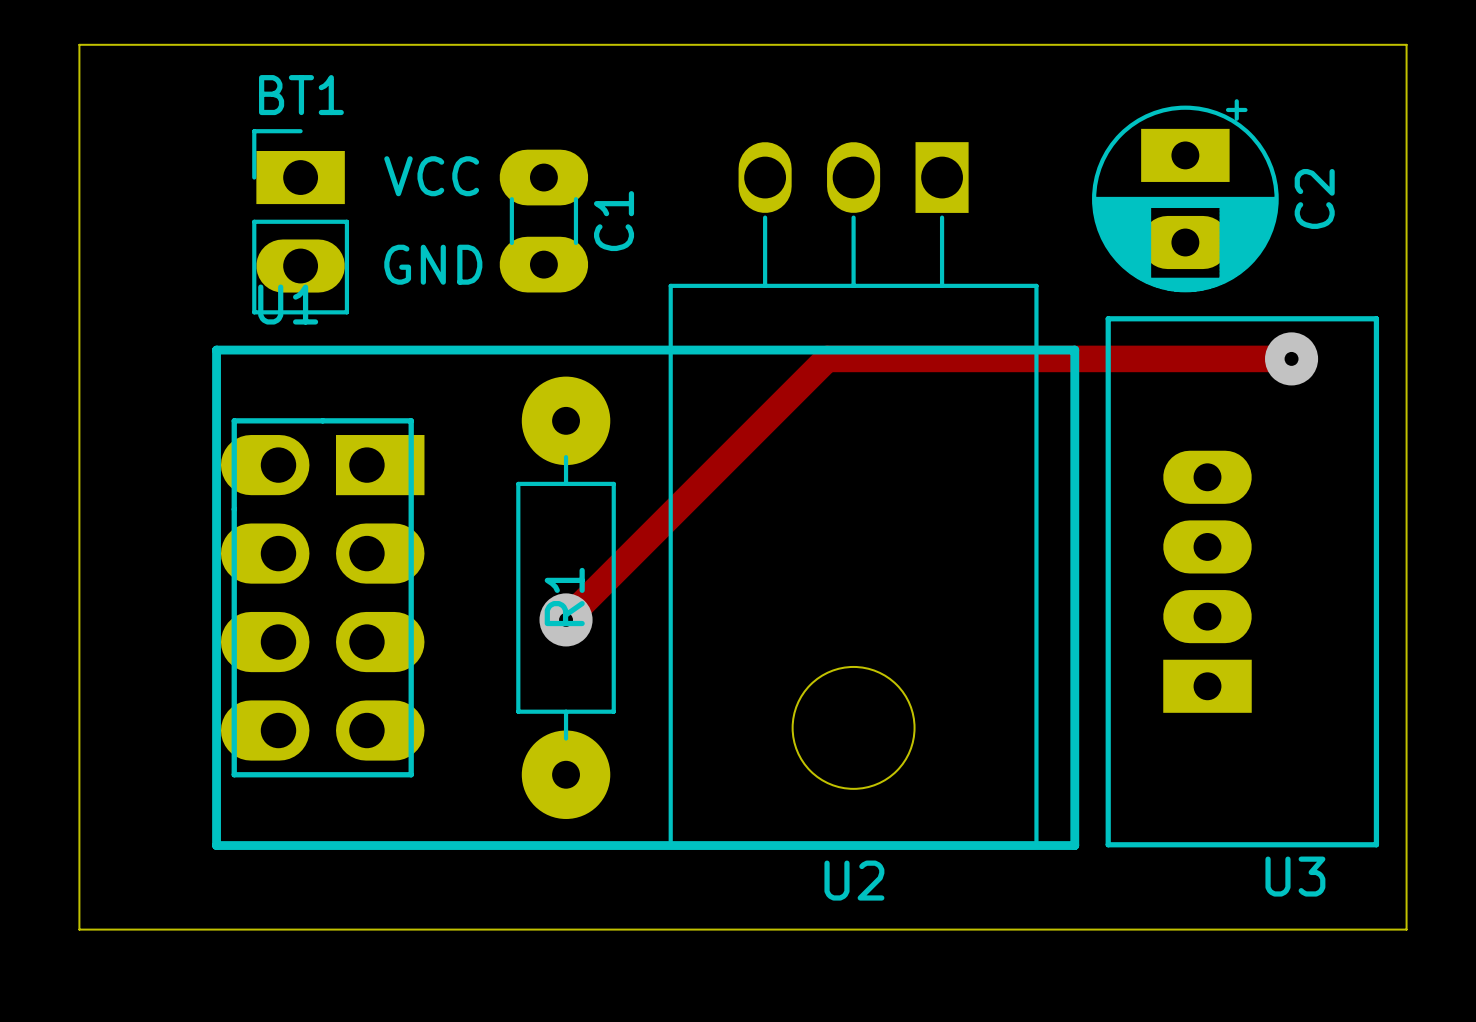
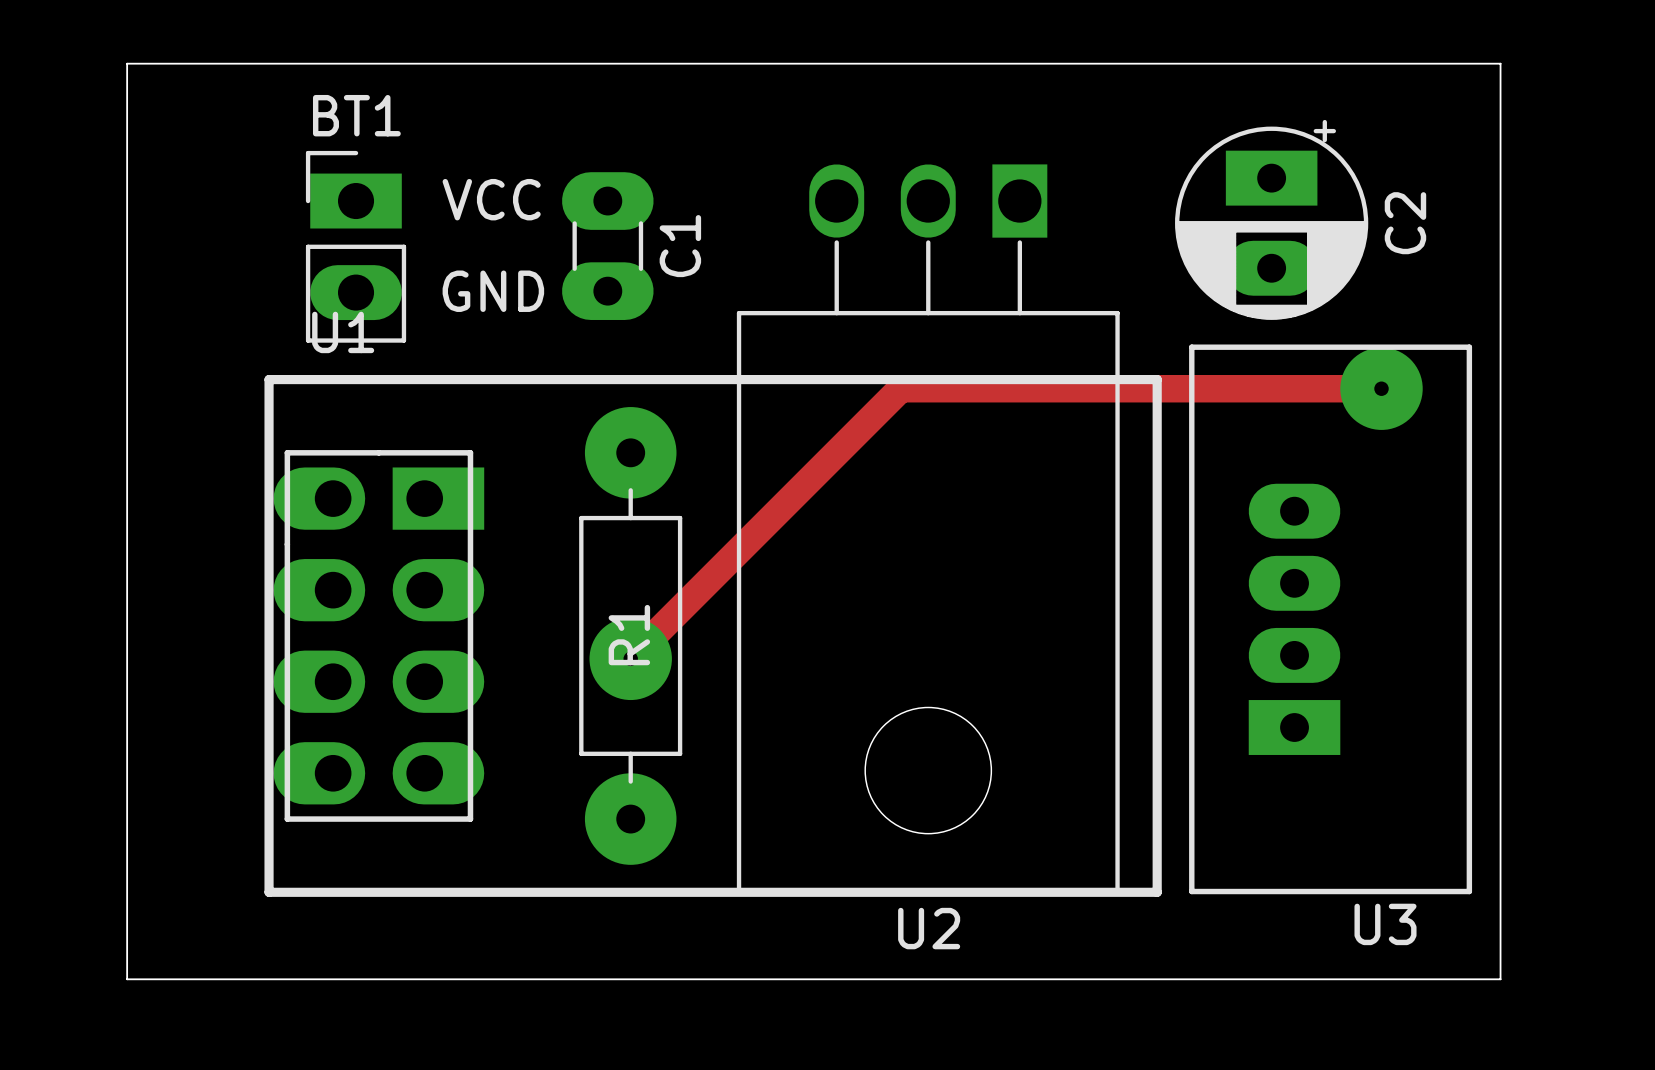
via size: [1265, 332, 1319, 386] -> [1340, 347, 1423, 430]
via size: [539, 593, 593, 647] -> [589, 617, 672, 701]

